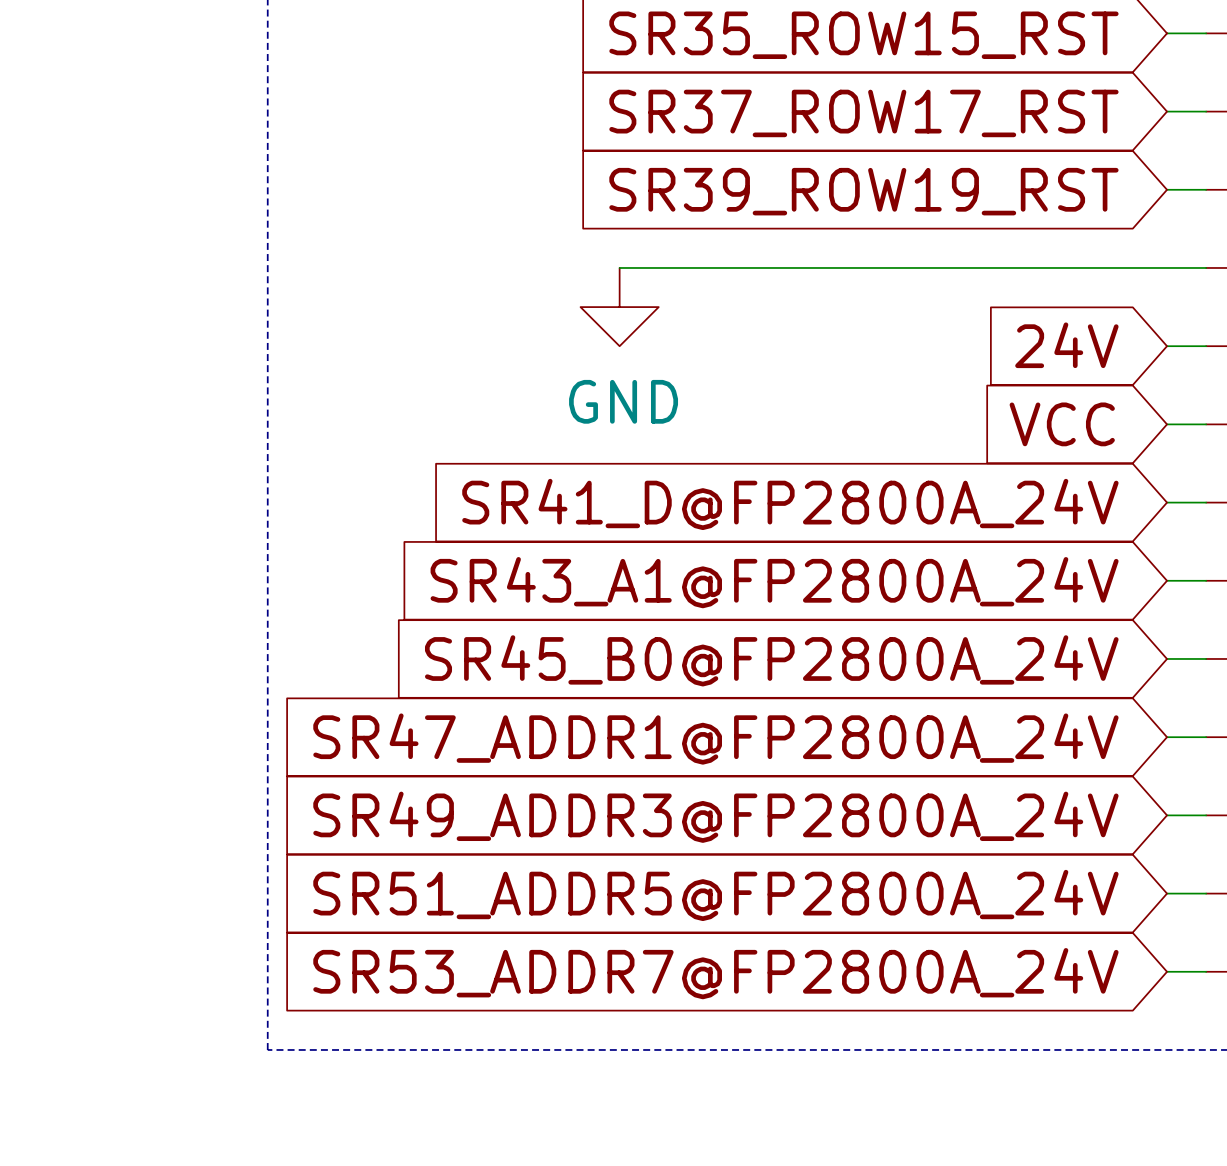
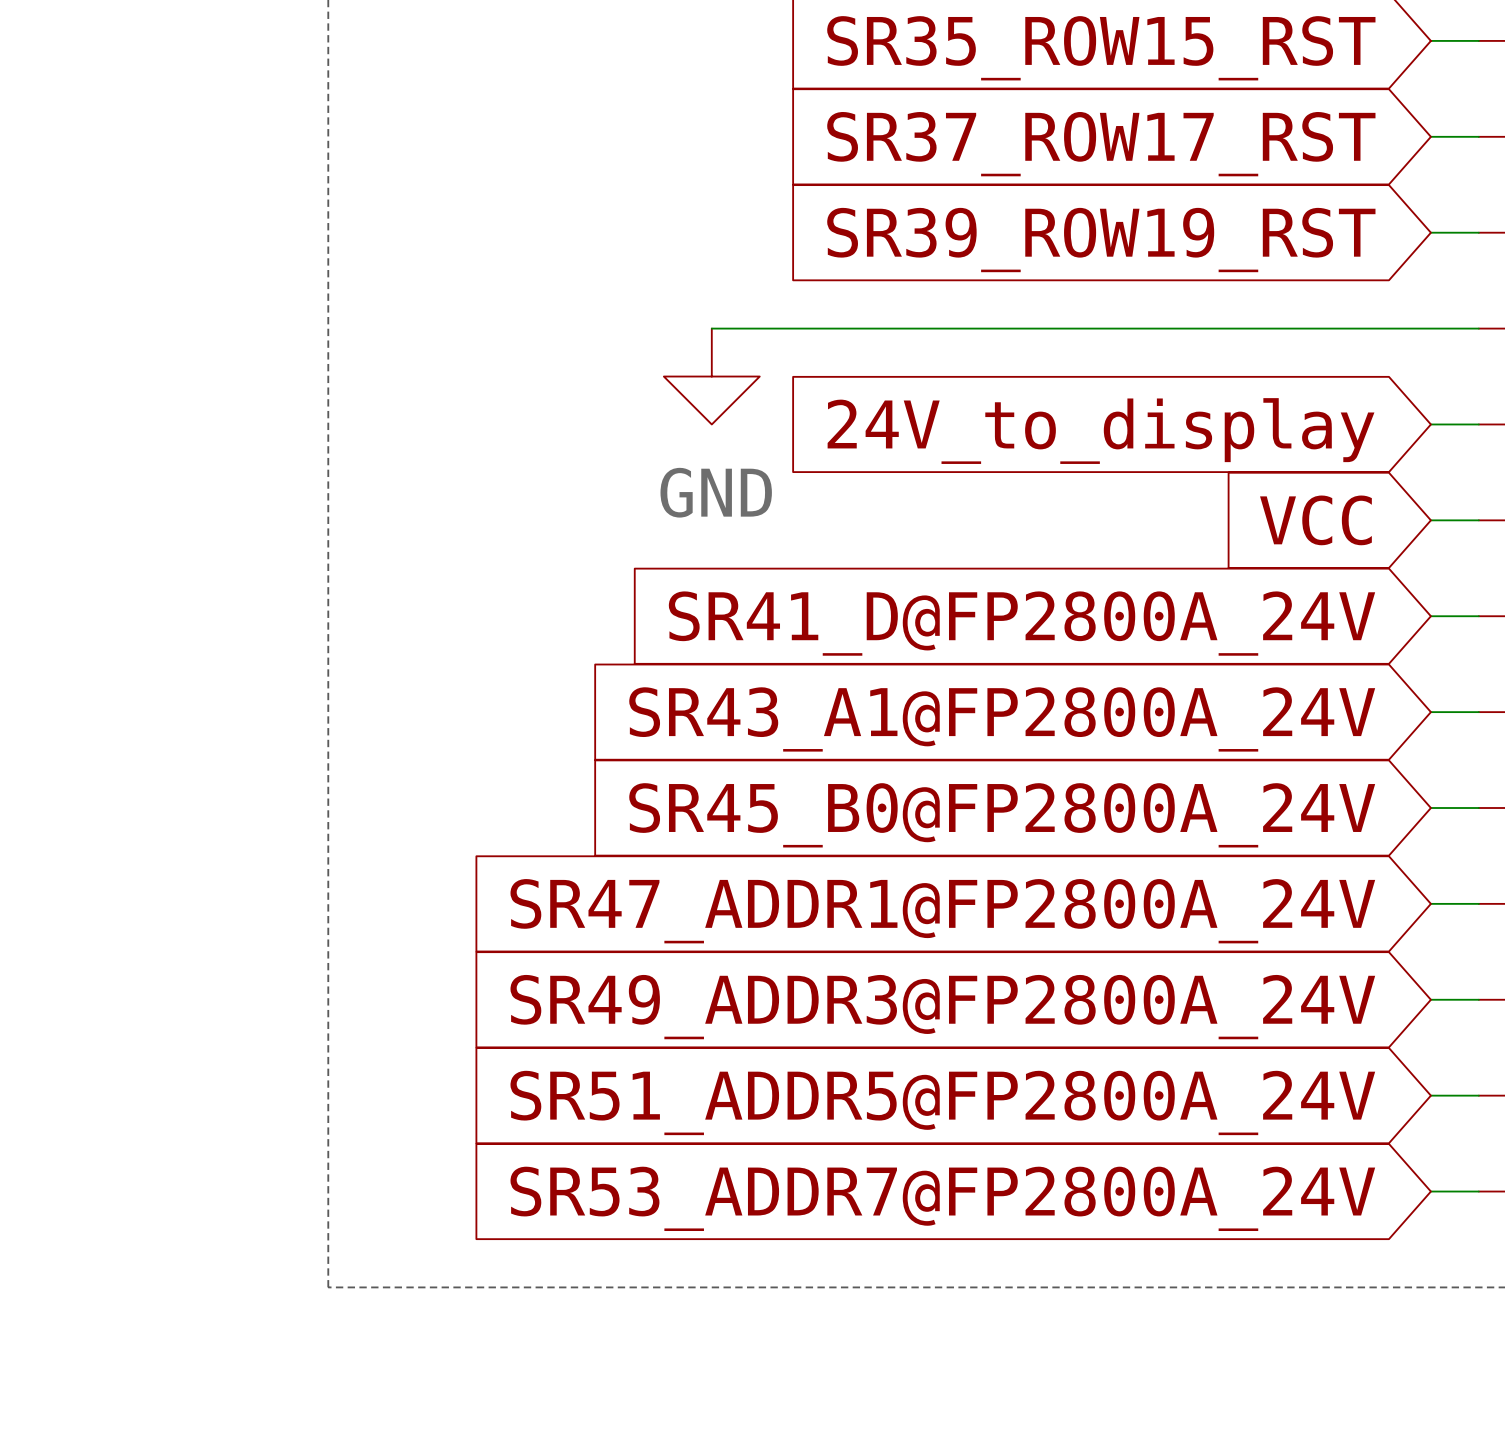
wire: none -> (711, 328) (759, 328)
power symbol position: GND (619, 307) -> GND (711, 376)
global label: 24V (1066, 345) -> 24V_to_display (1101, 431)

